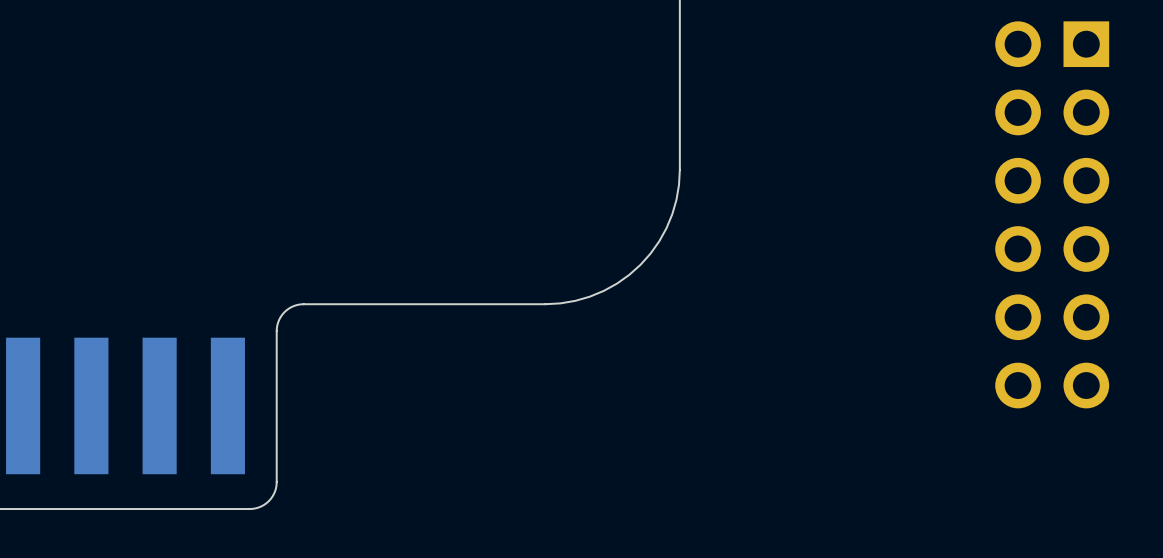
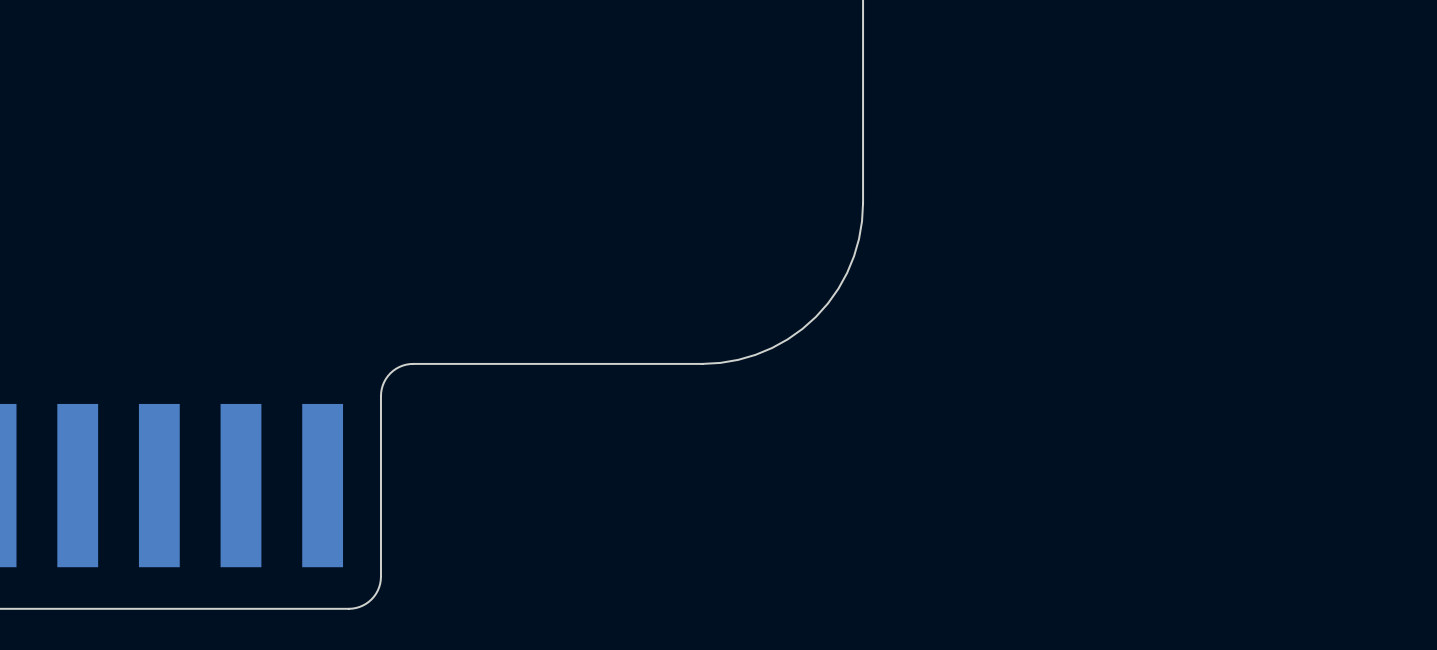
part: (1052, 214) -> none

